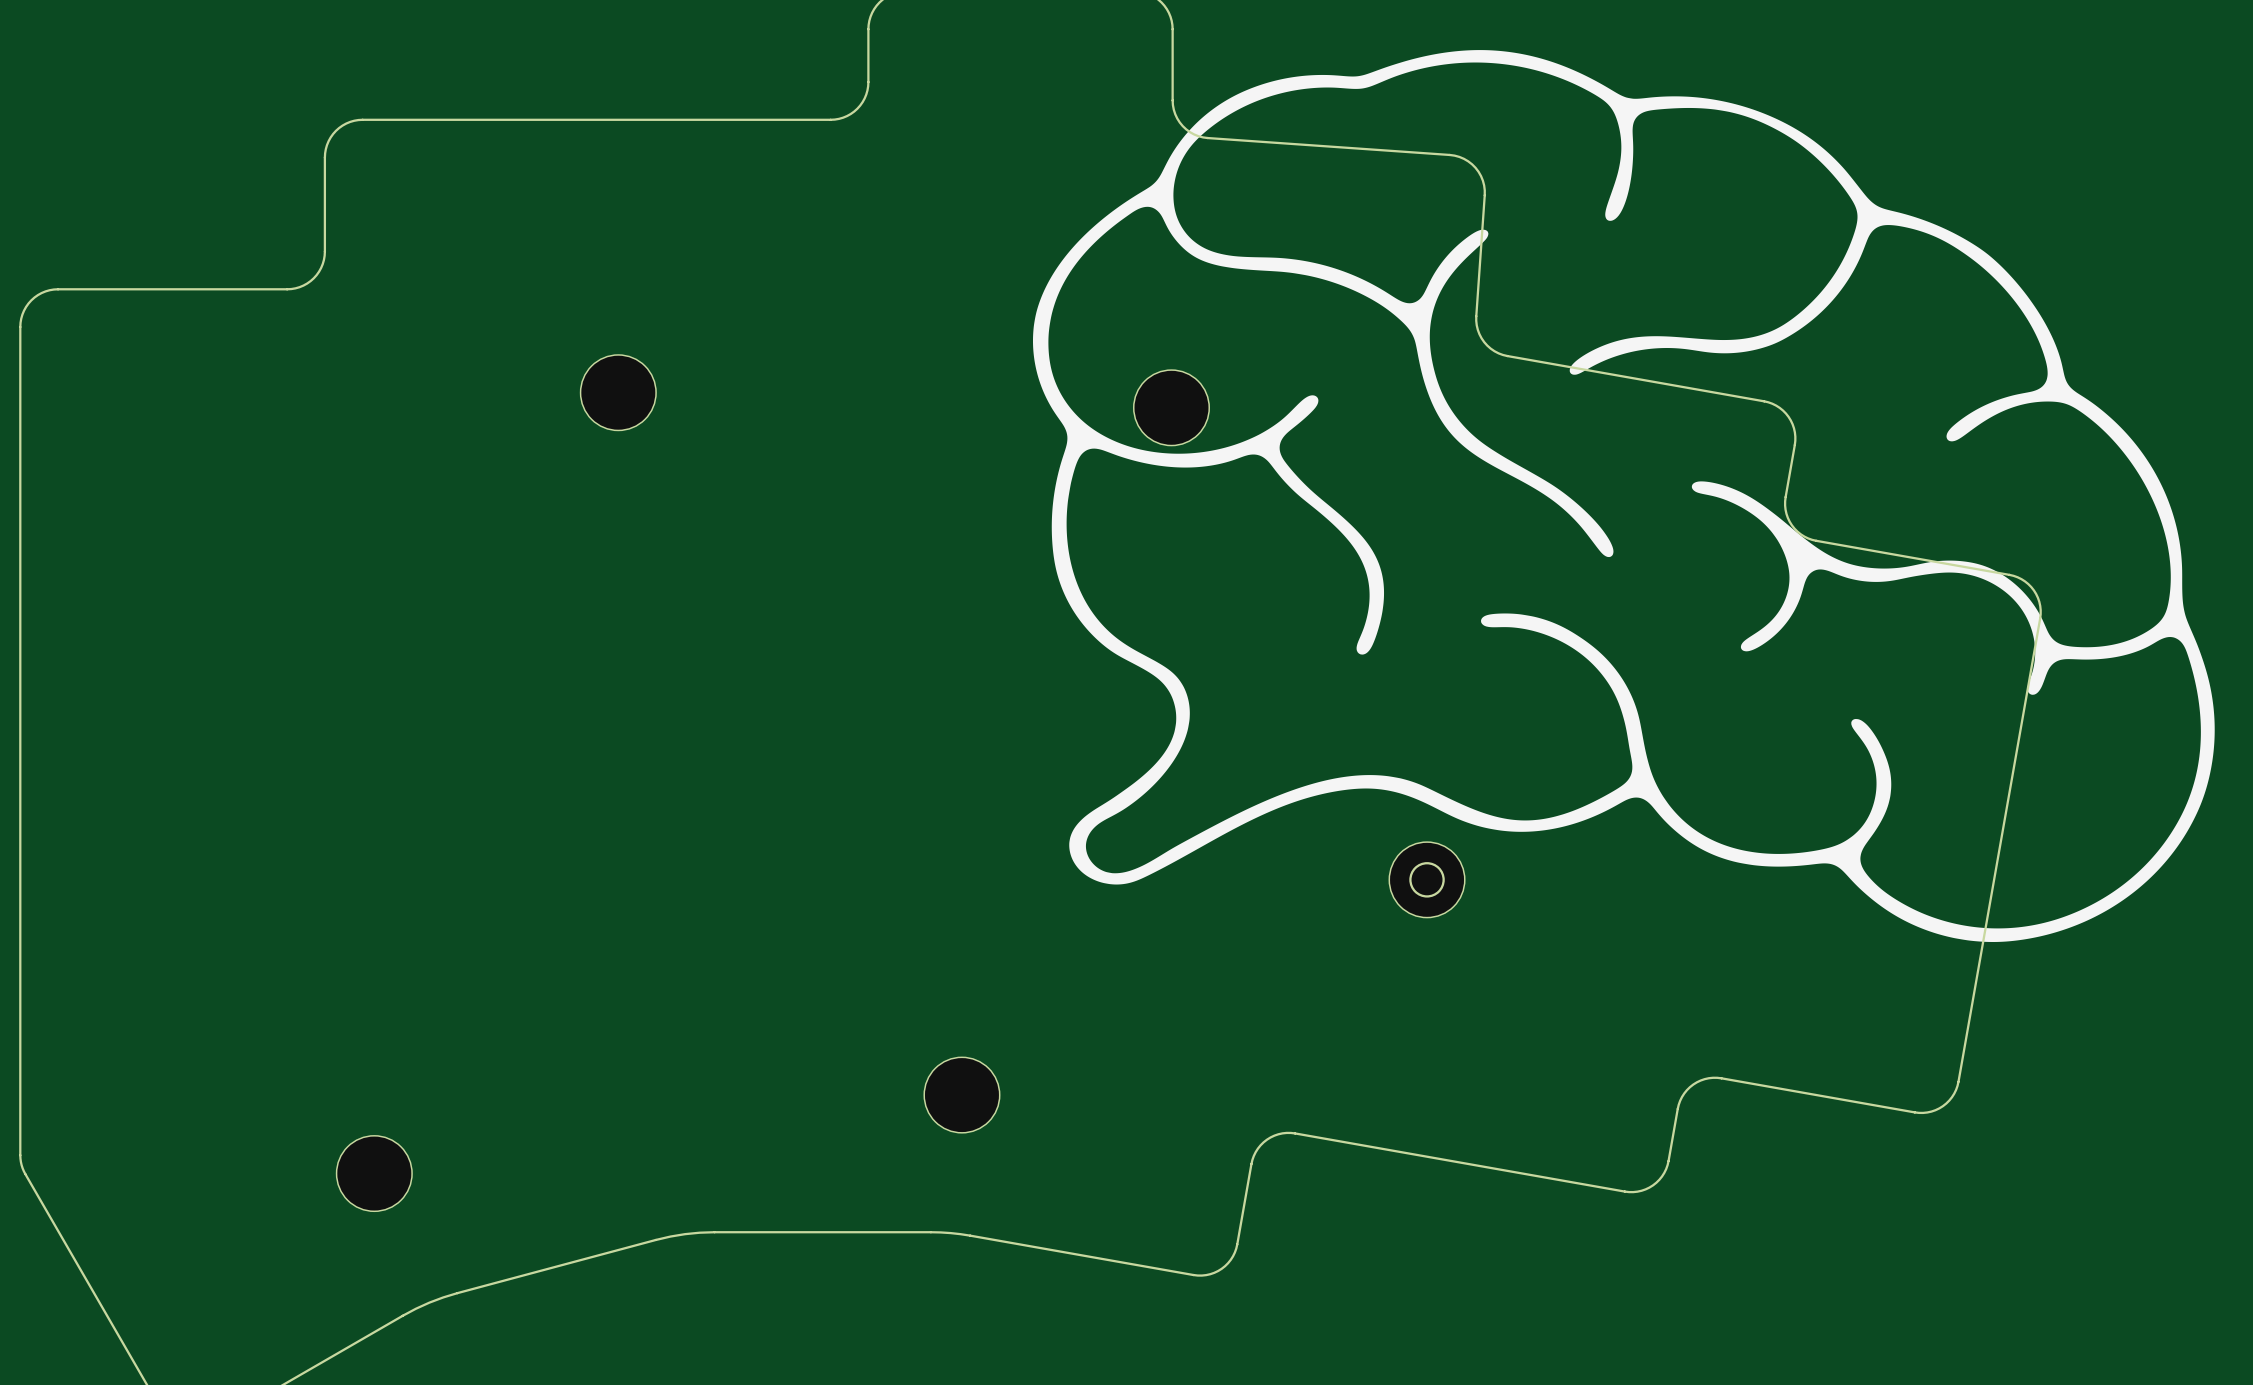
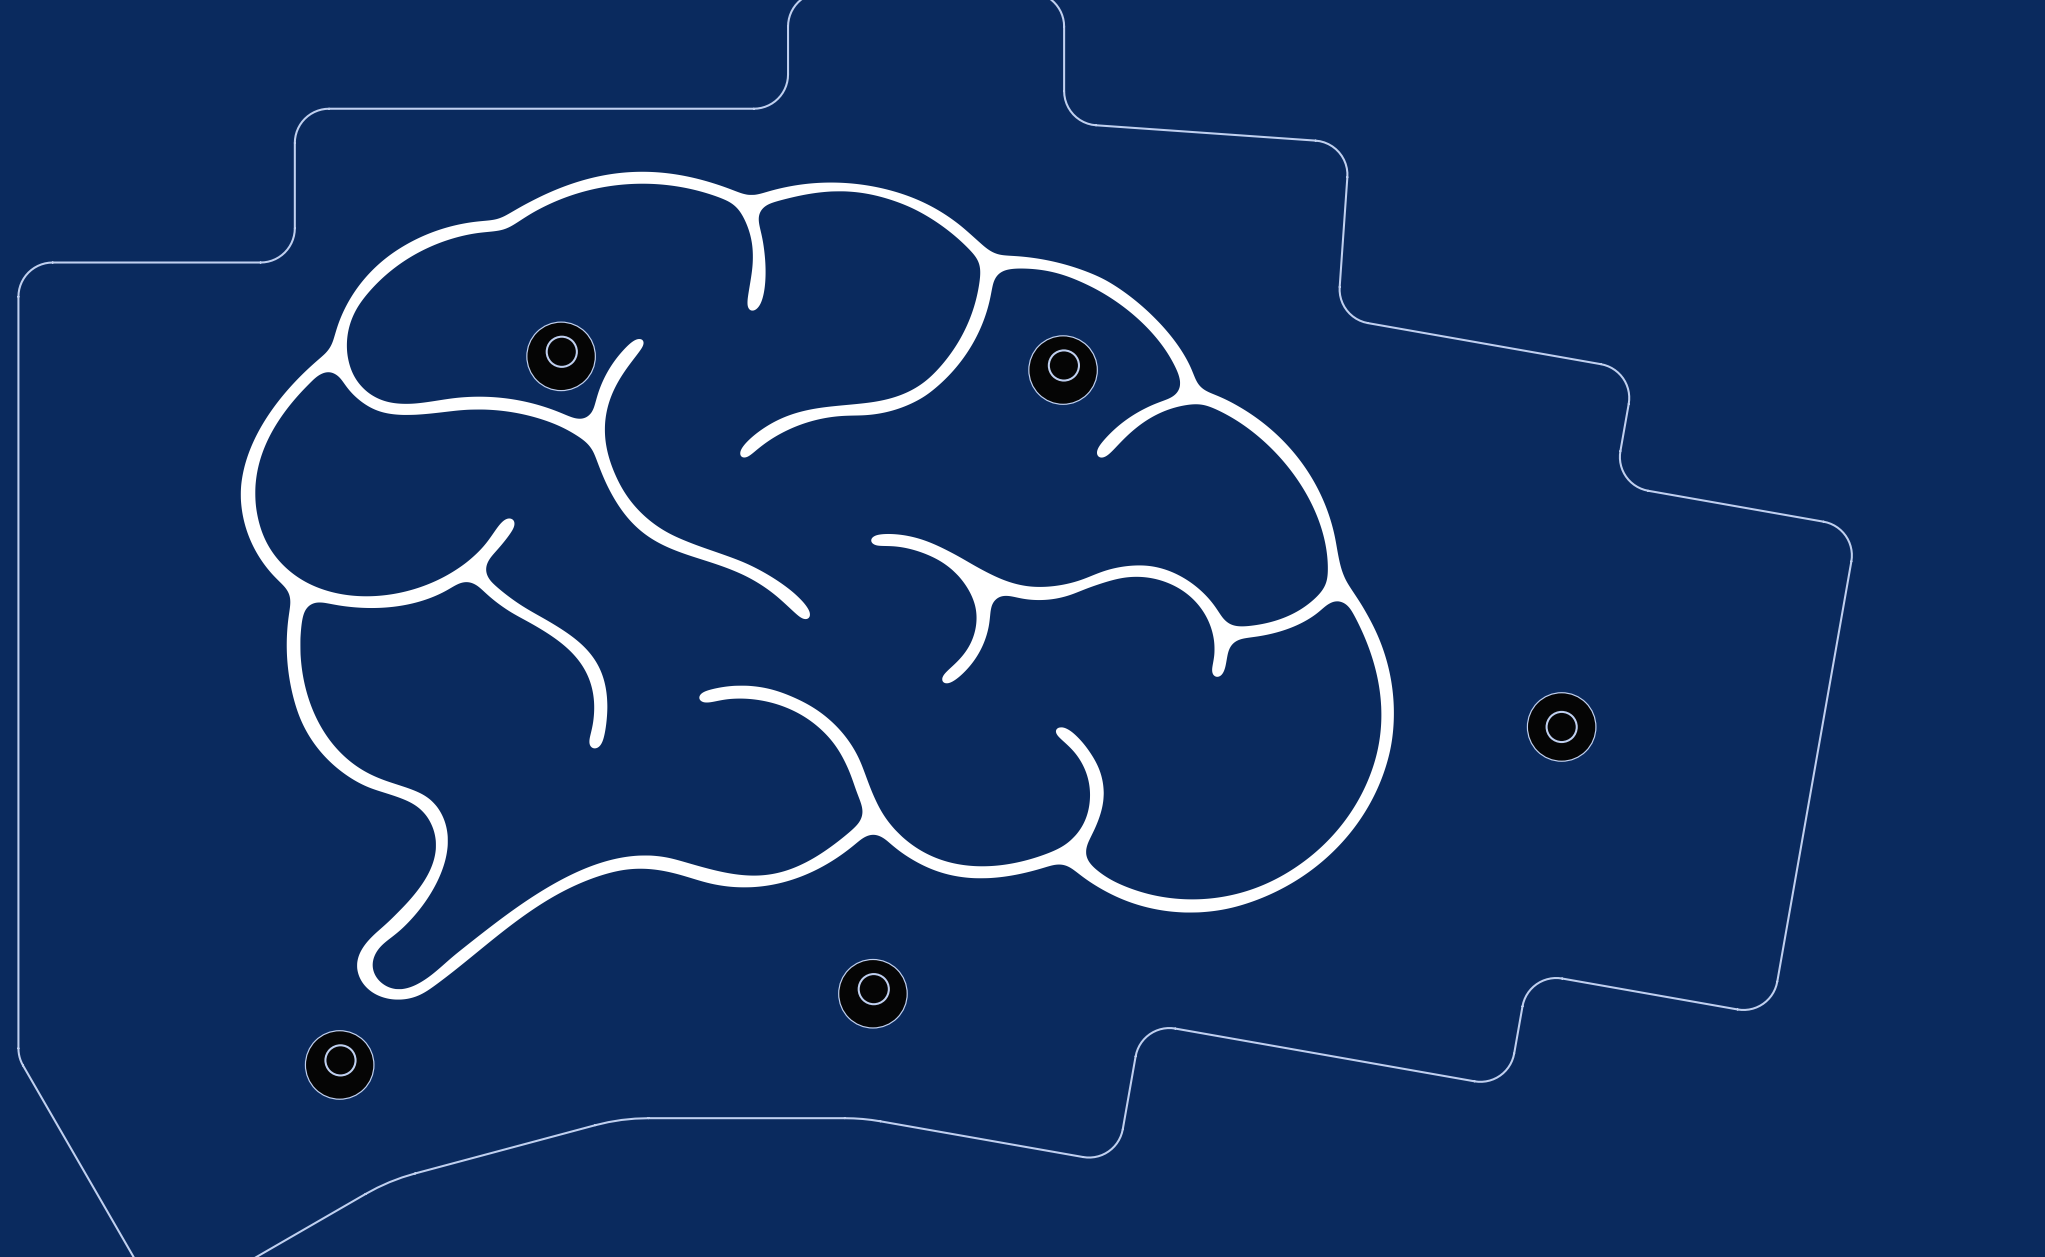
drawing: [1032, 50, 2215, 943] -> none
drawing: none -> [240, 171, 1394, 1000]
round board edge: none -> [545, 335, 578, 368]
round board edge: none -> [1047, 349, 1080, 382]
round board edge: none -> [1545, 710, 1578, 744]
round board edge: [1409, 862, 1445, 898] -> none
part position: (1427, 879) -> (1561, 726)
round board edge: none -> [857, 973, 890, 1006]
round board edge: none -> [324, 1044, 357, 1077]

